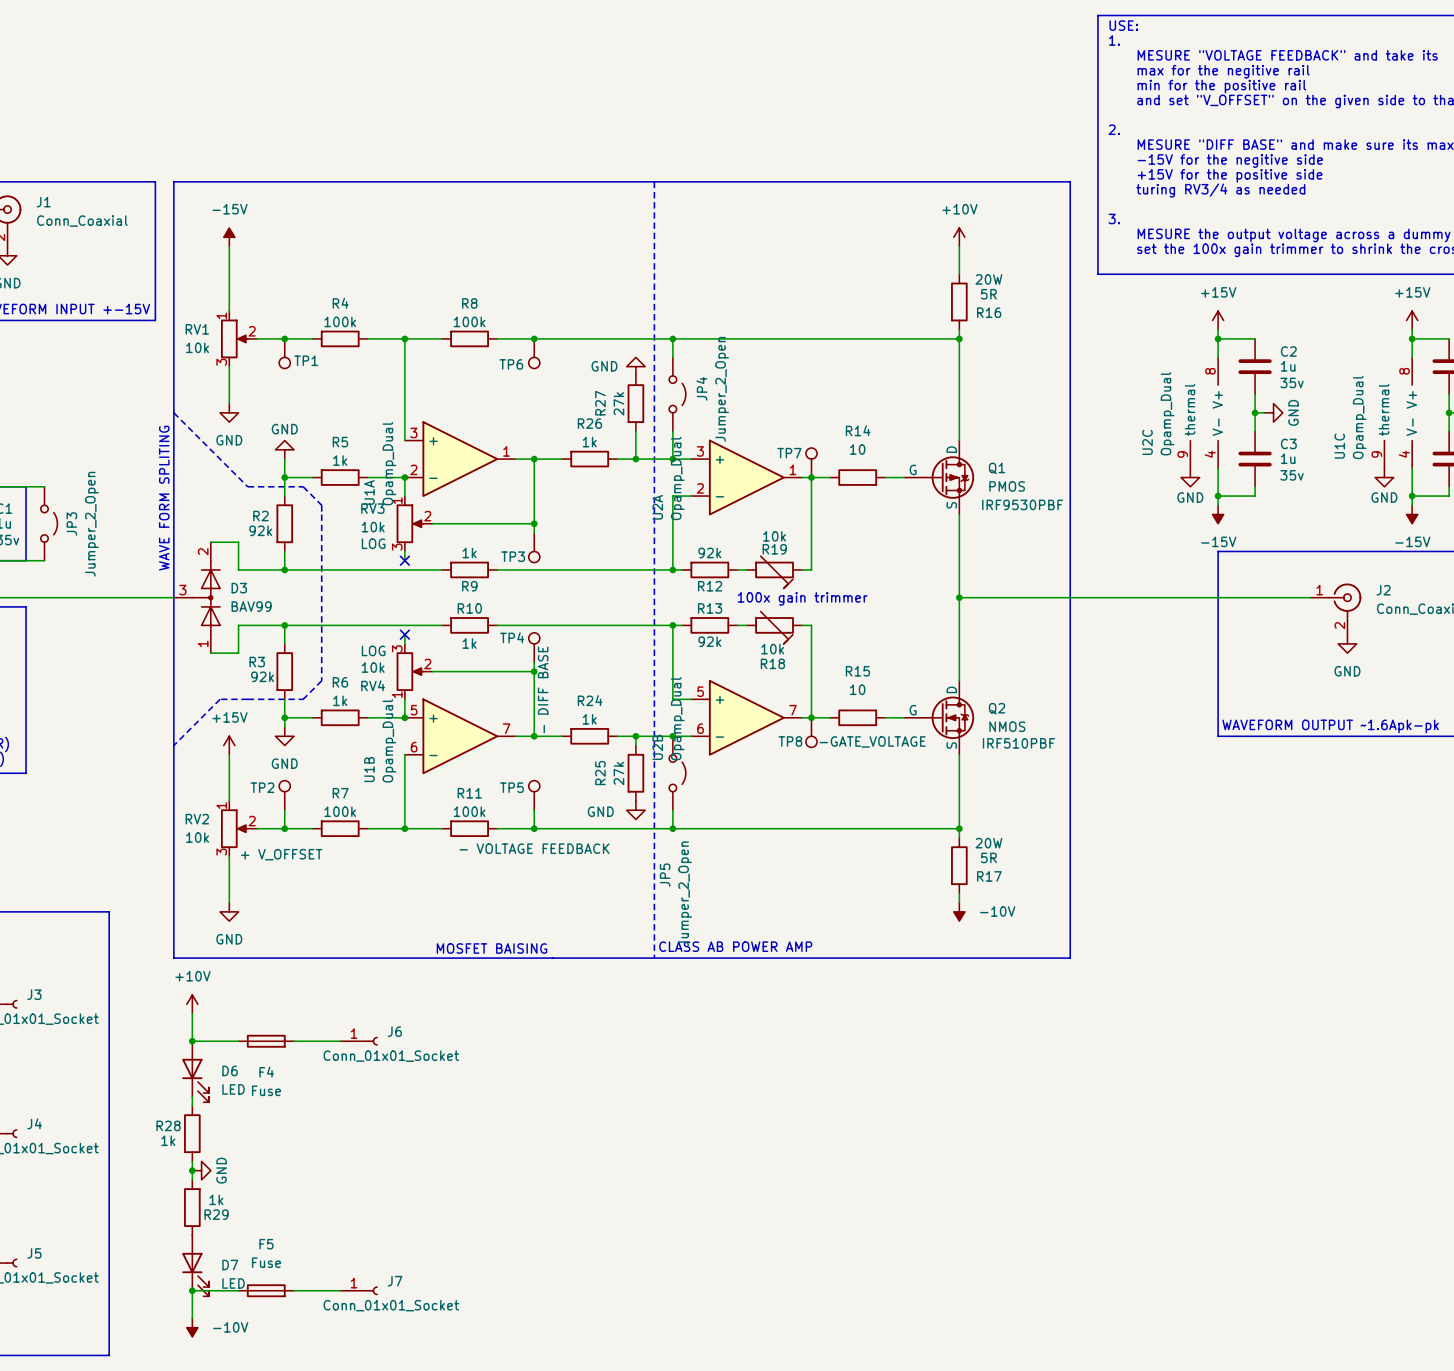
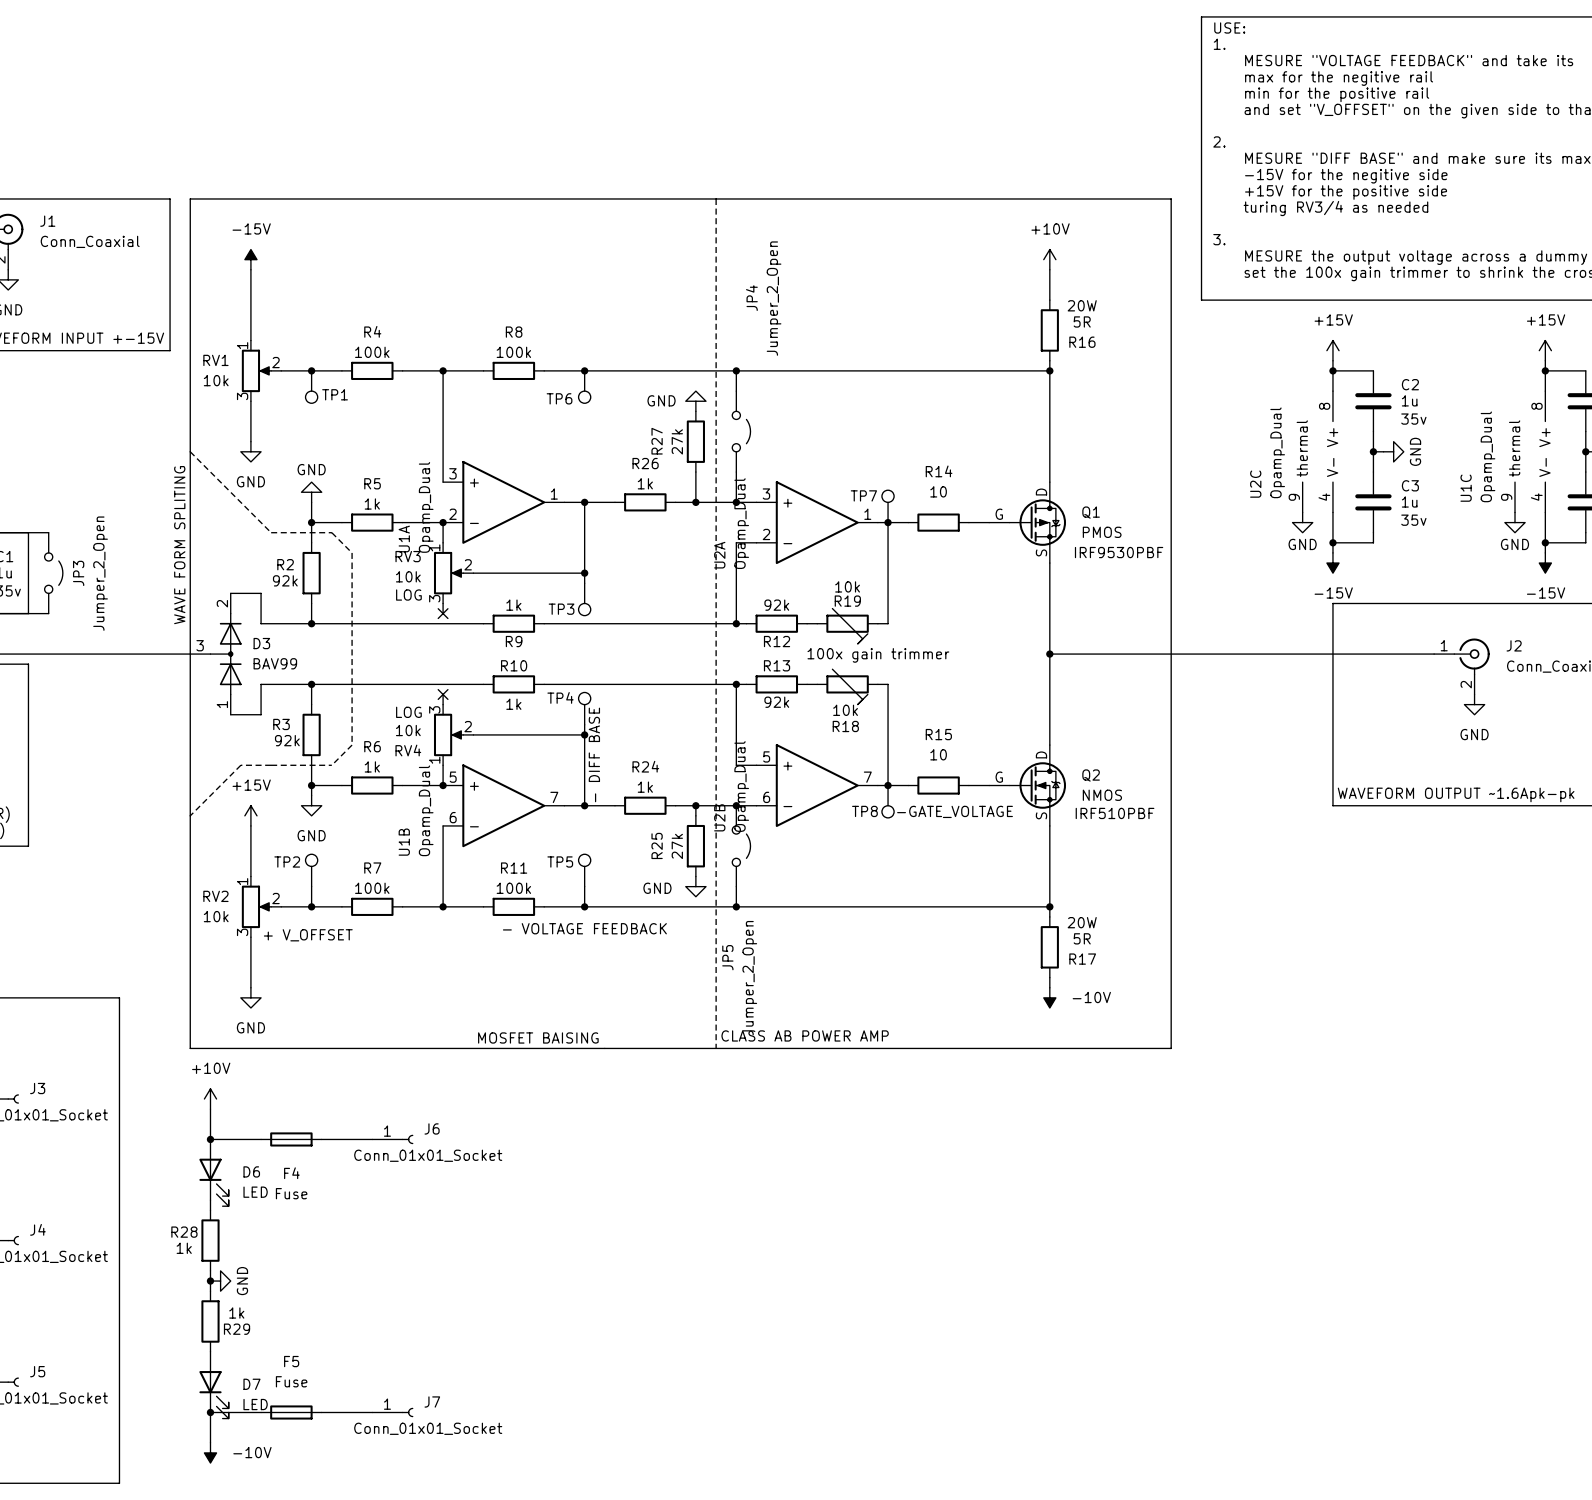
JP4 name position: JP4 (701, 388) -> JP4 (751, 298)
JP4 value position: Jumper_2_Open (722, 389) -> Jumper_2_Open (774, 298)

